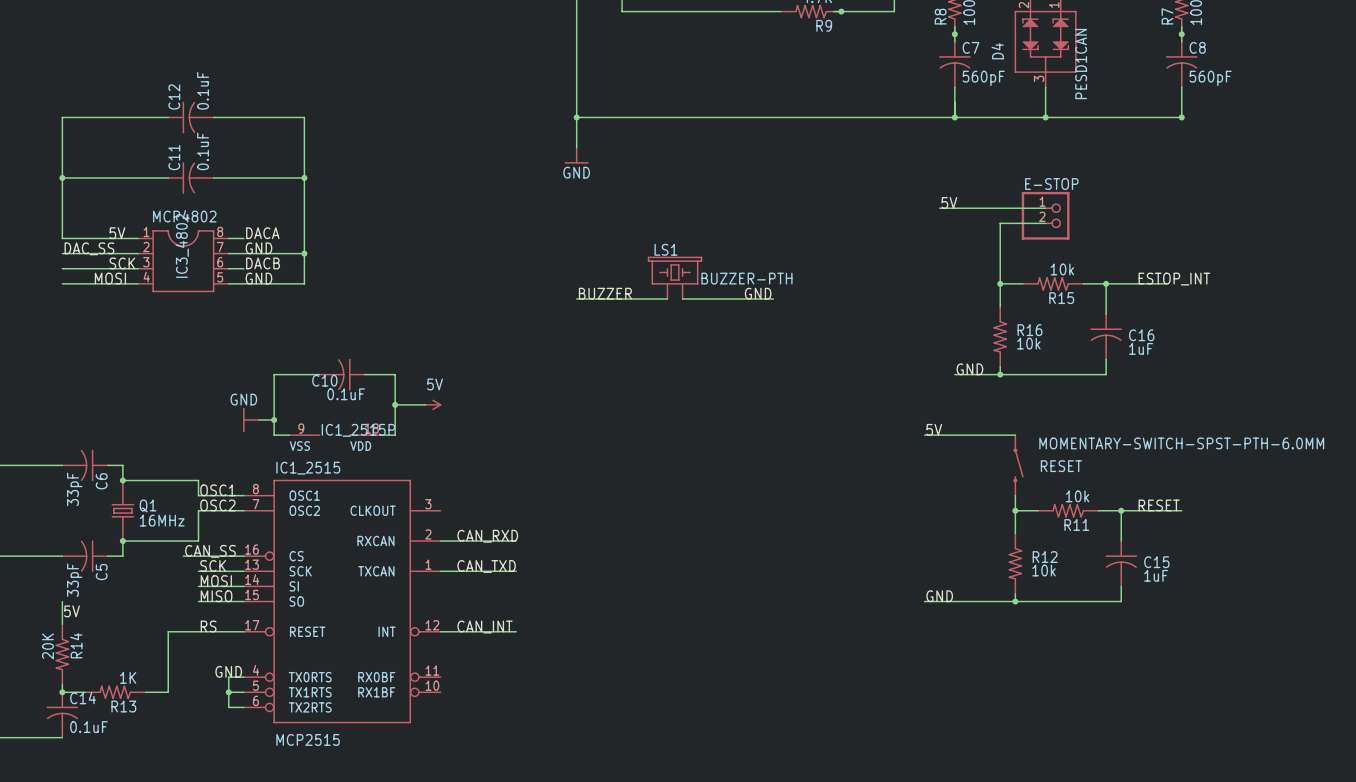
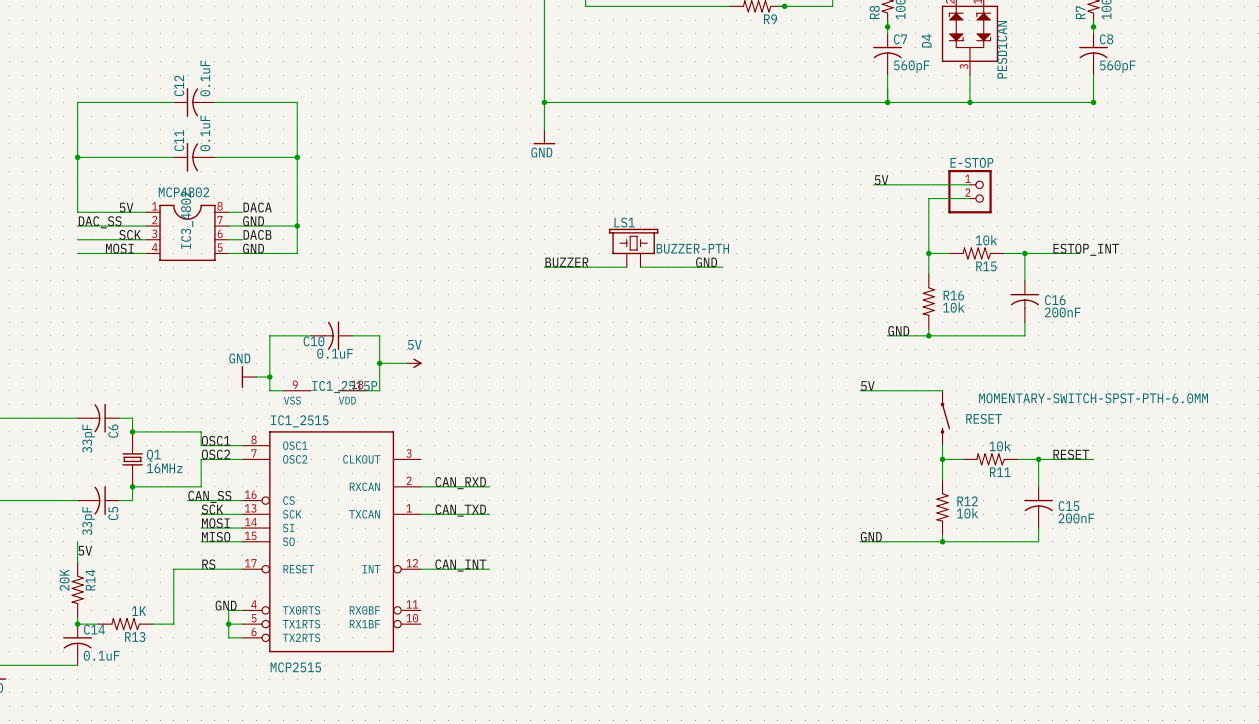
C16 value: 1uF (1141, 348) -> 200nF (1062, 312)
C15 value: 1uF (1156, 575) -> 200nF (1076, 518)

